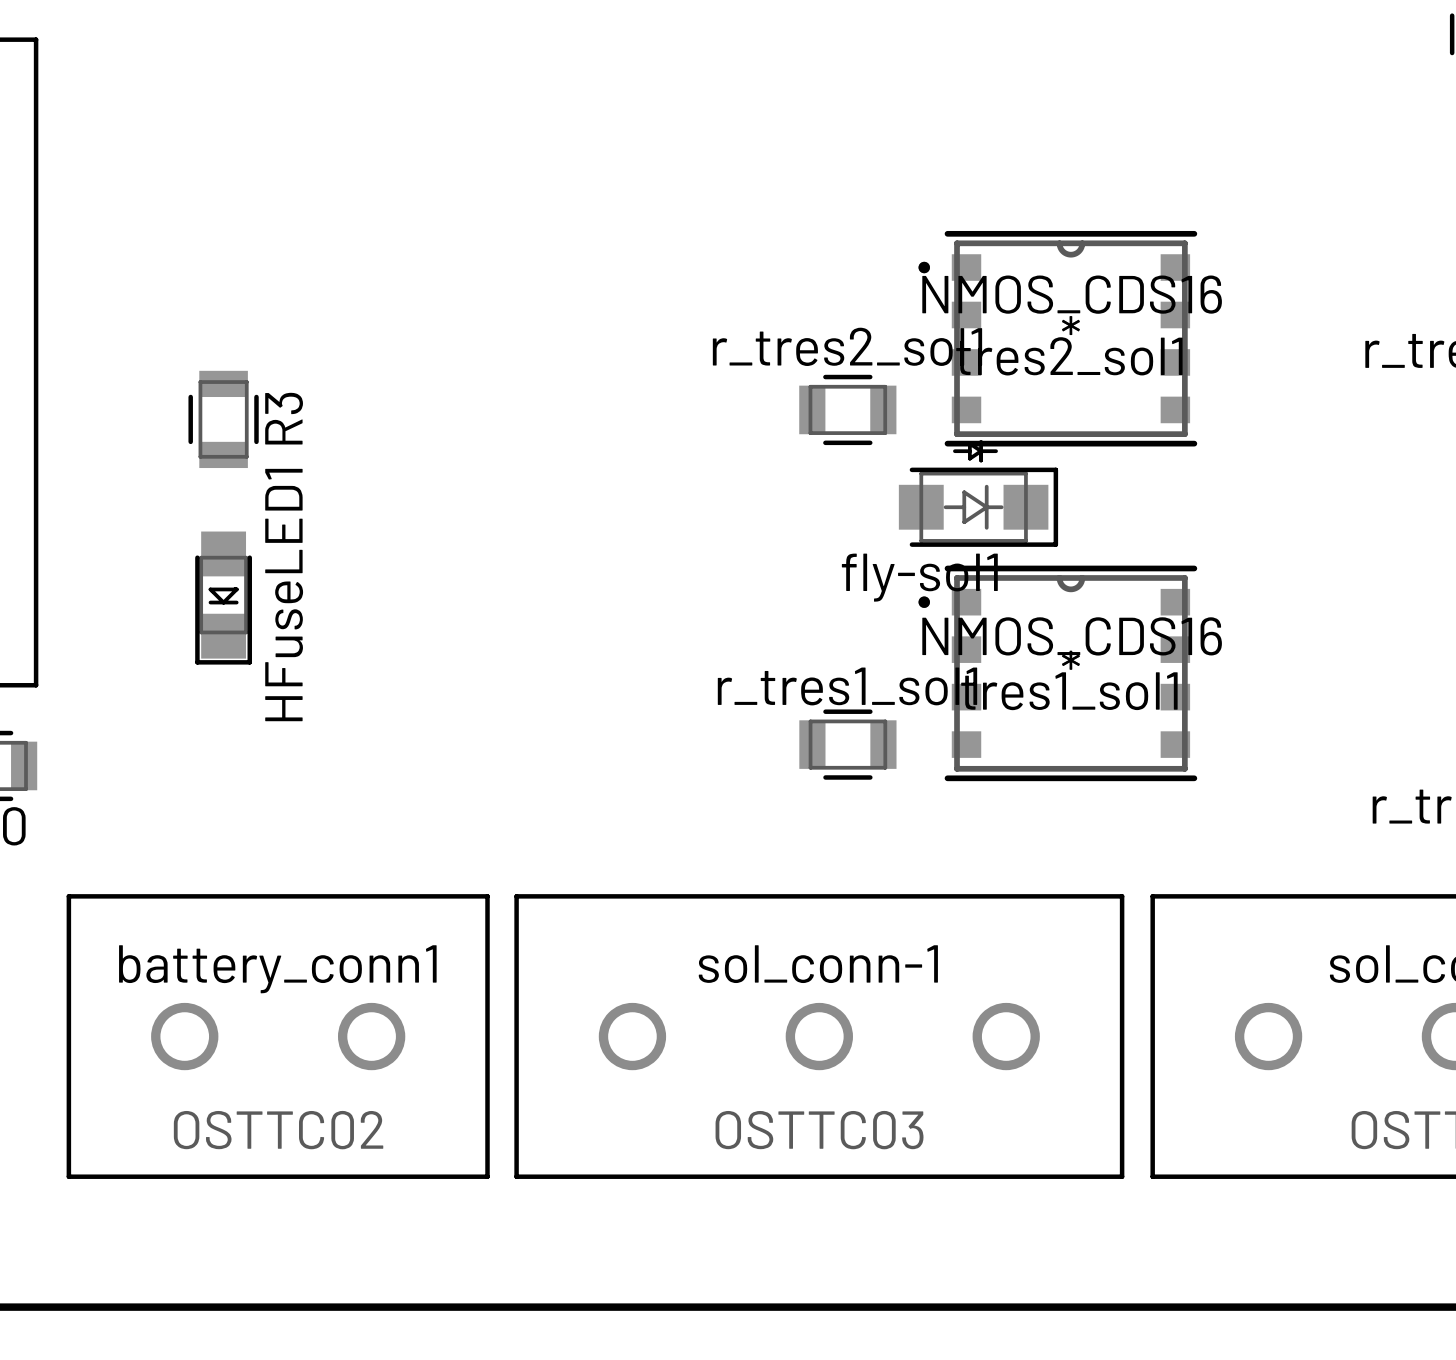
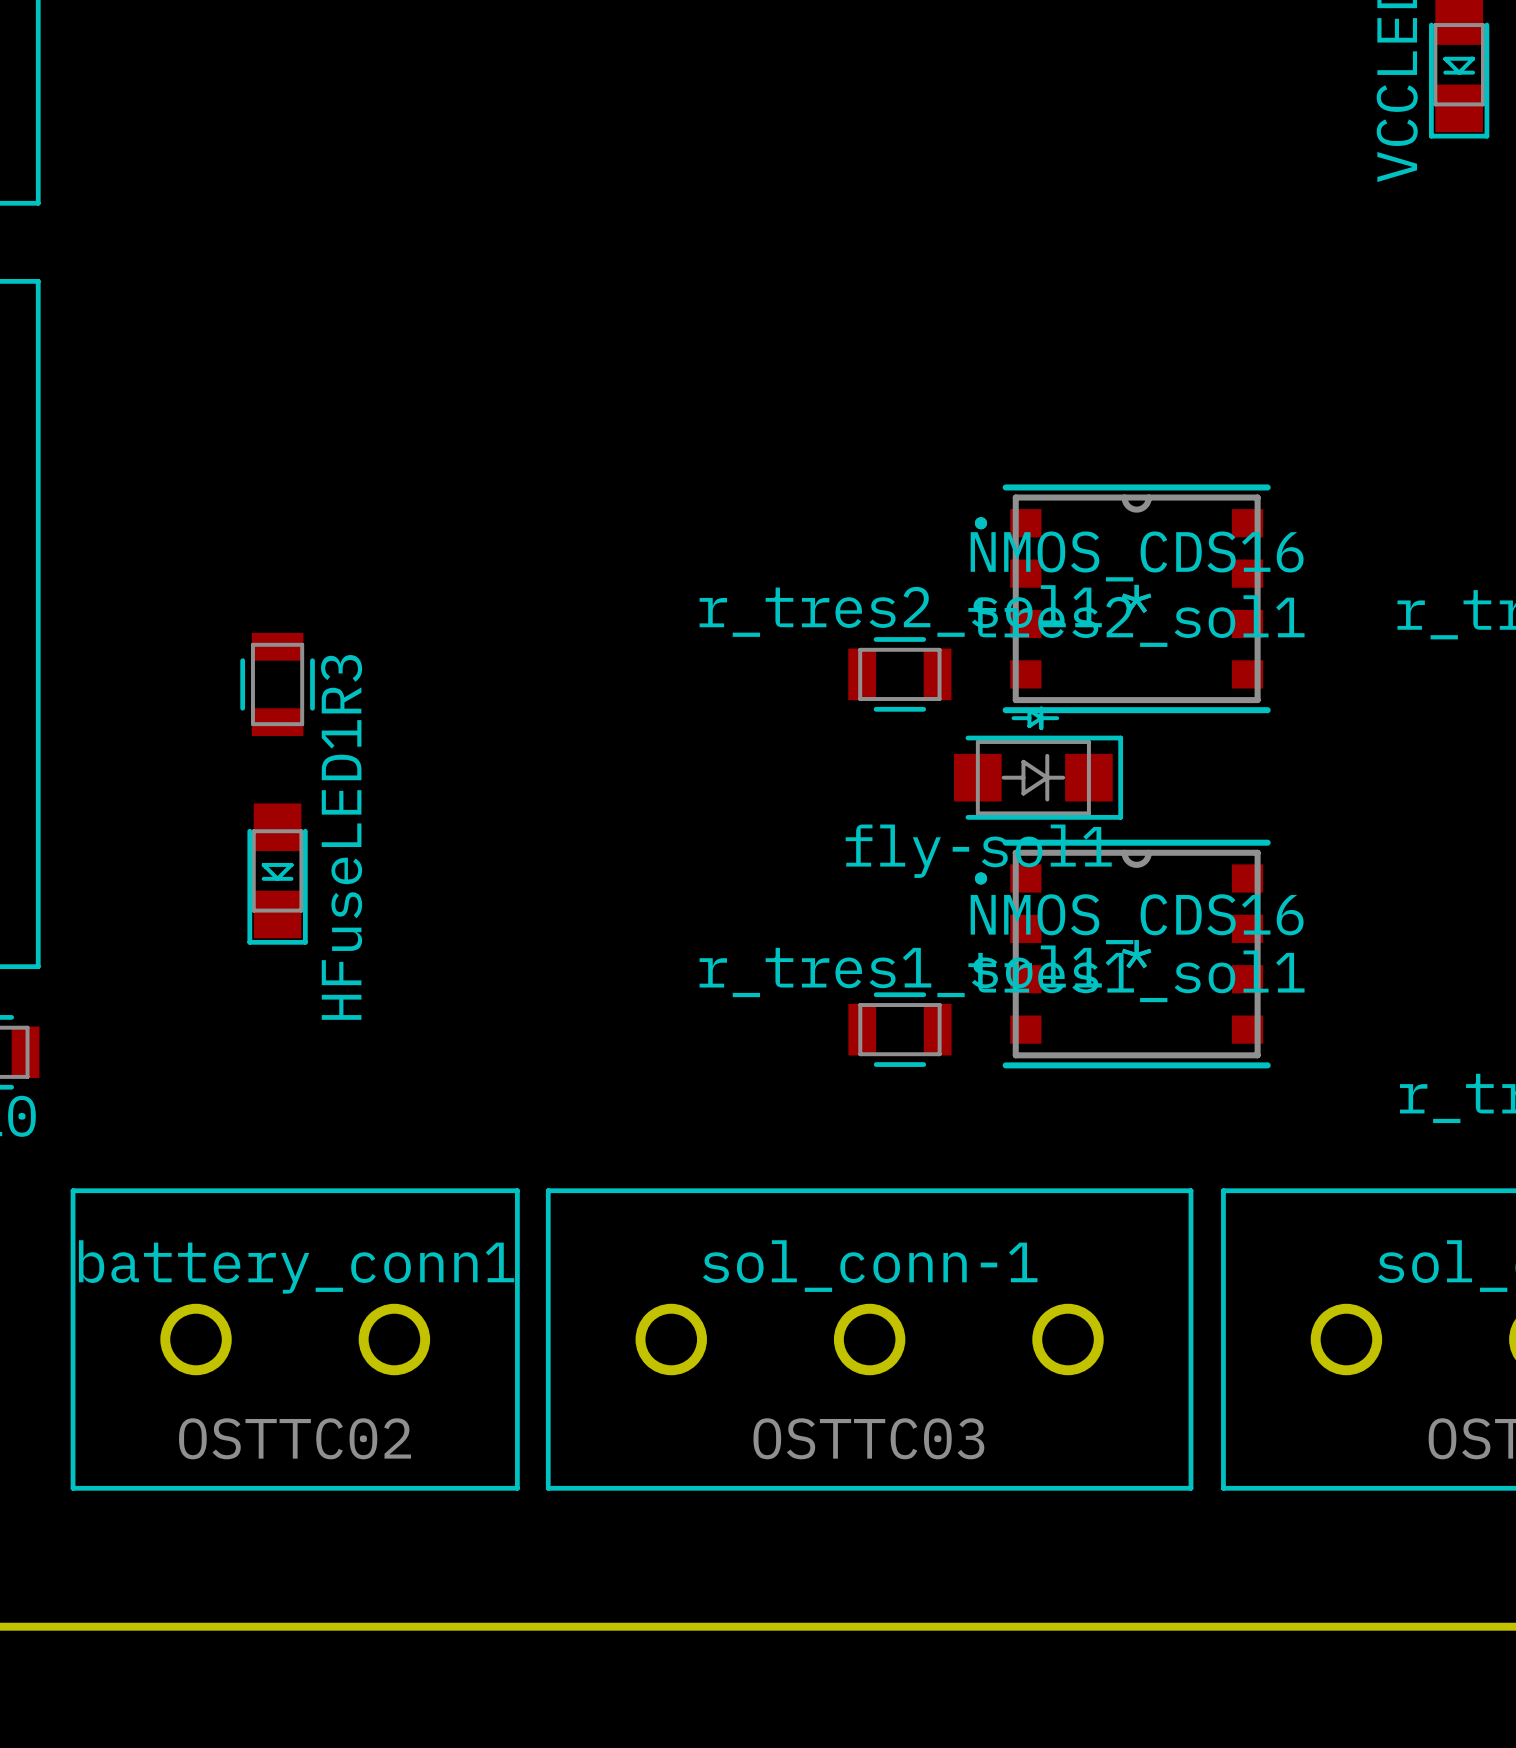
R3 position: (223, 419) -> (277, 684)
HFuseLED1 position: (223, 598) -> (277, 874)

